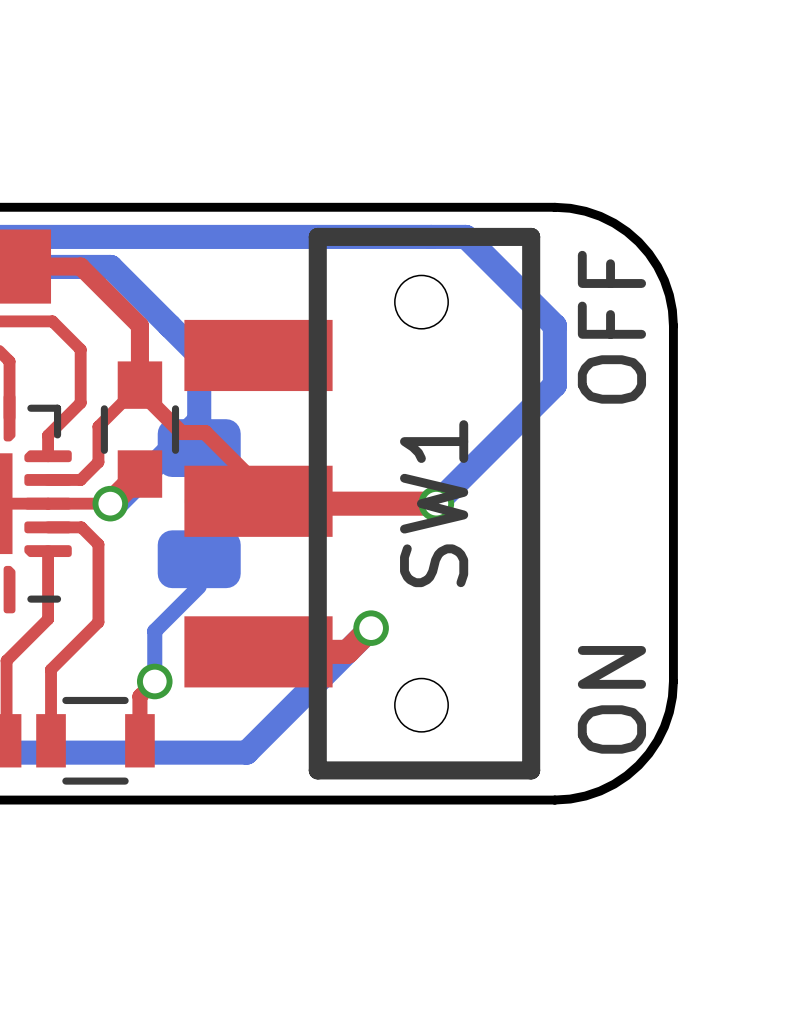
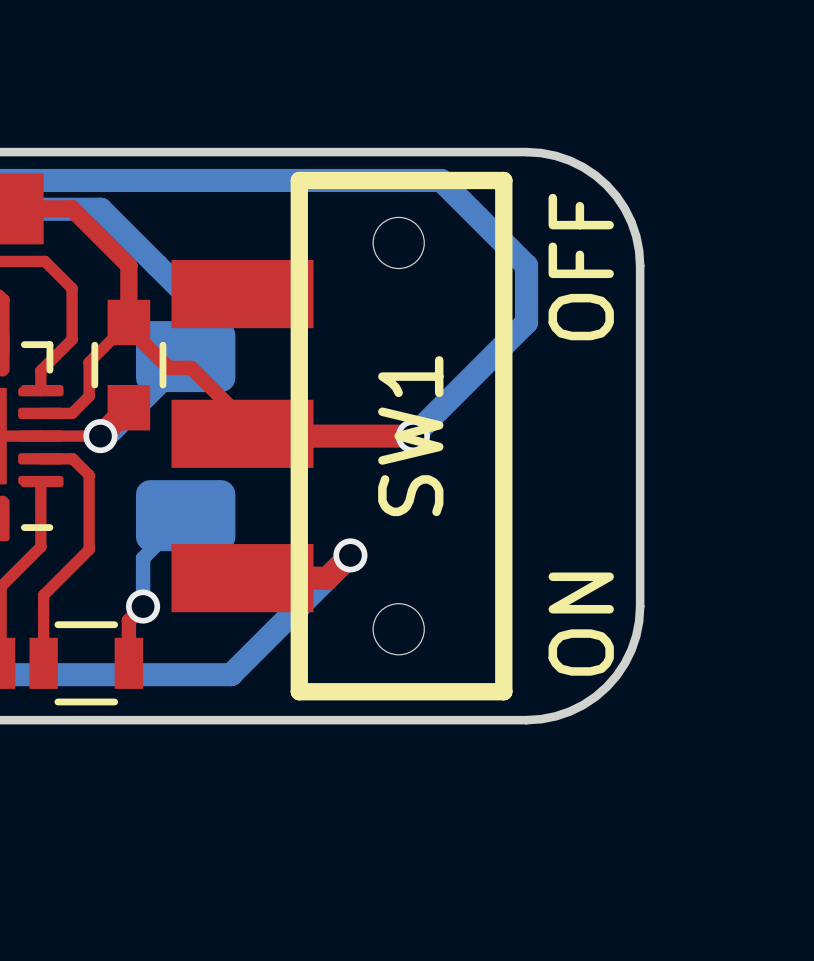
part footprint: [157, 419, 241, 589] -> [135, 321, 236, 552]

